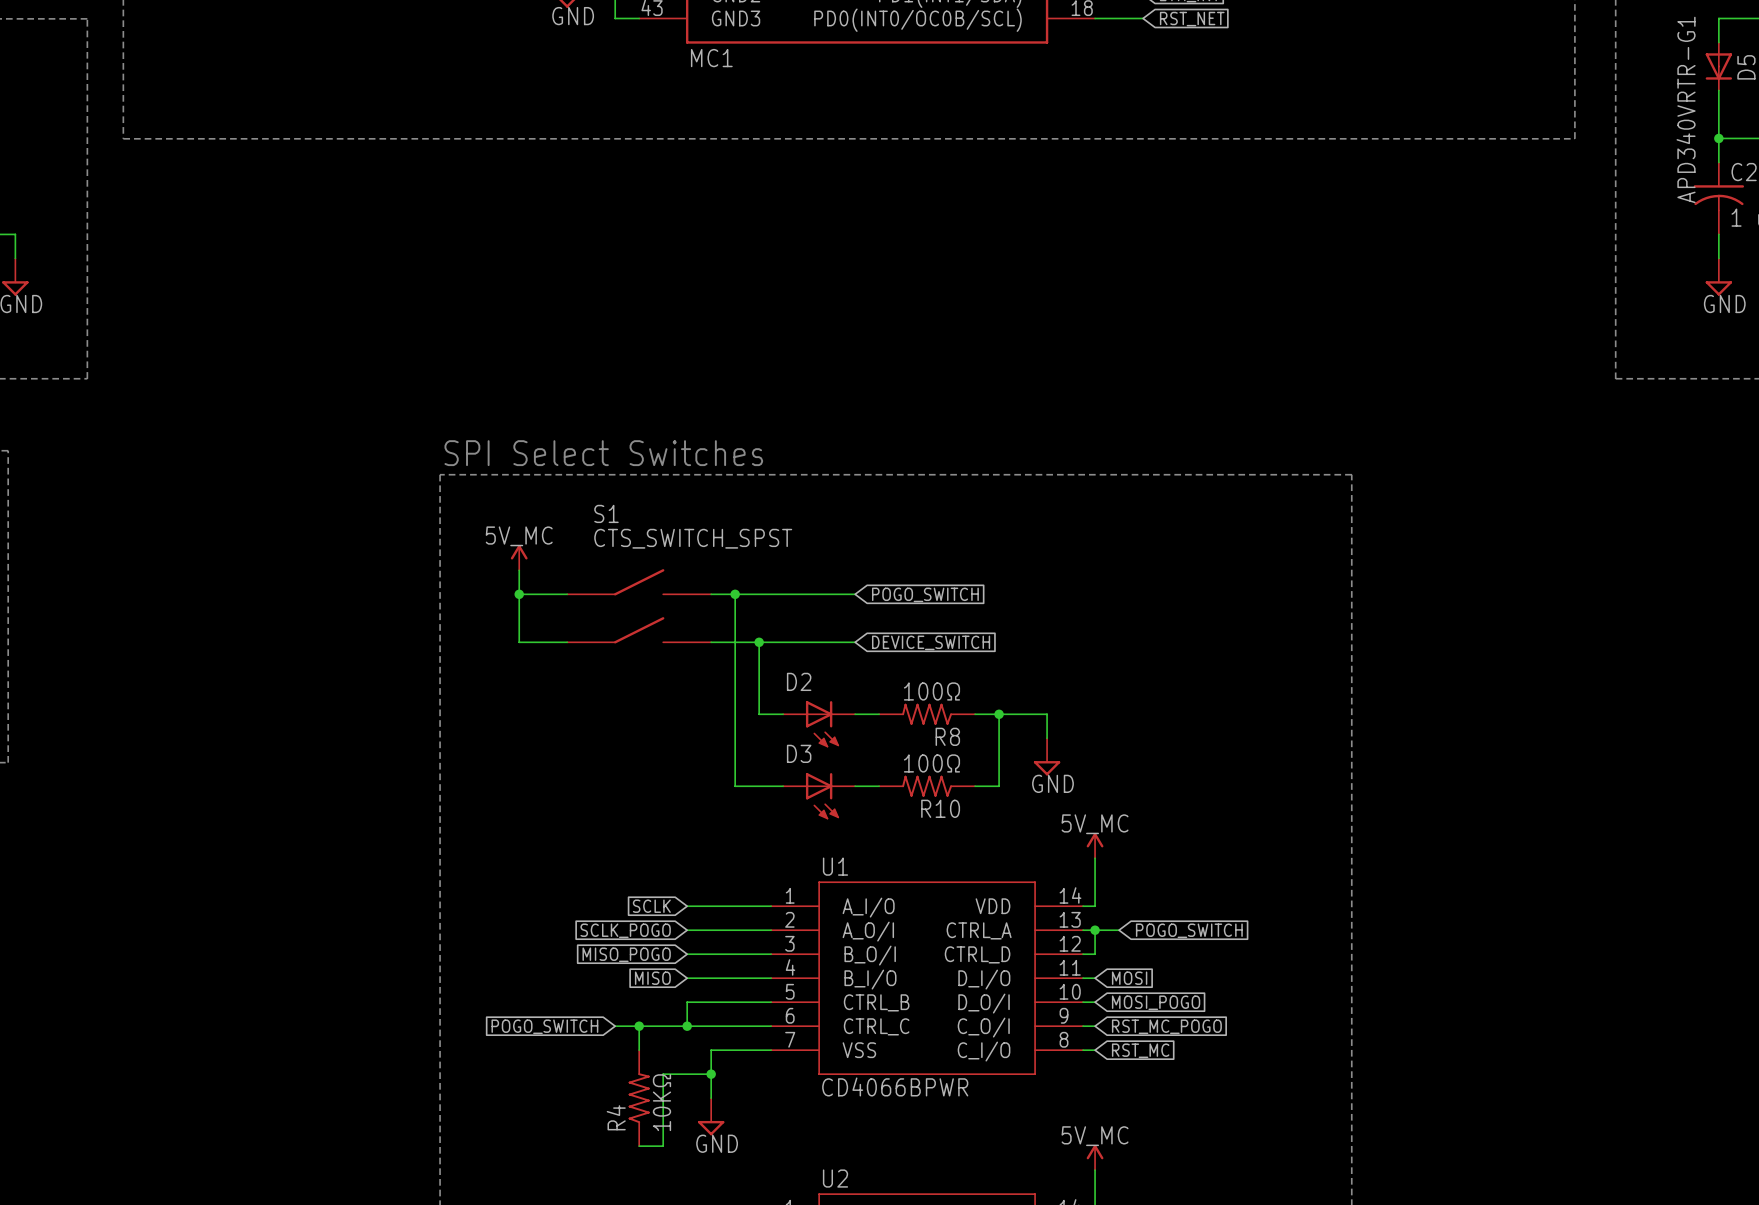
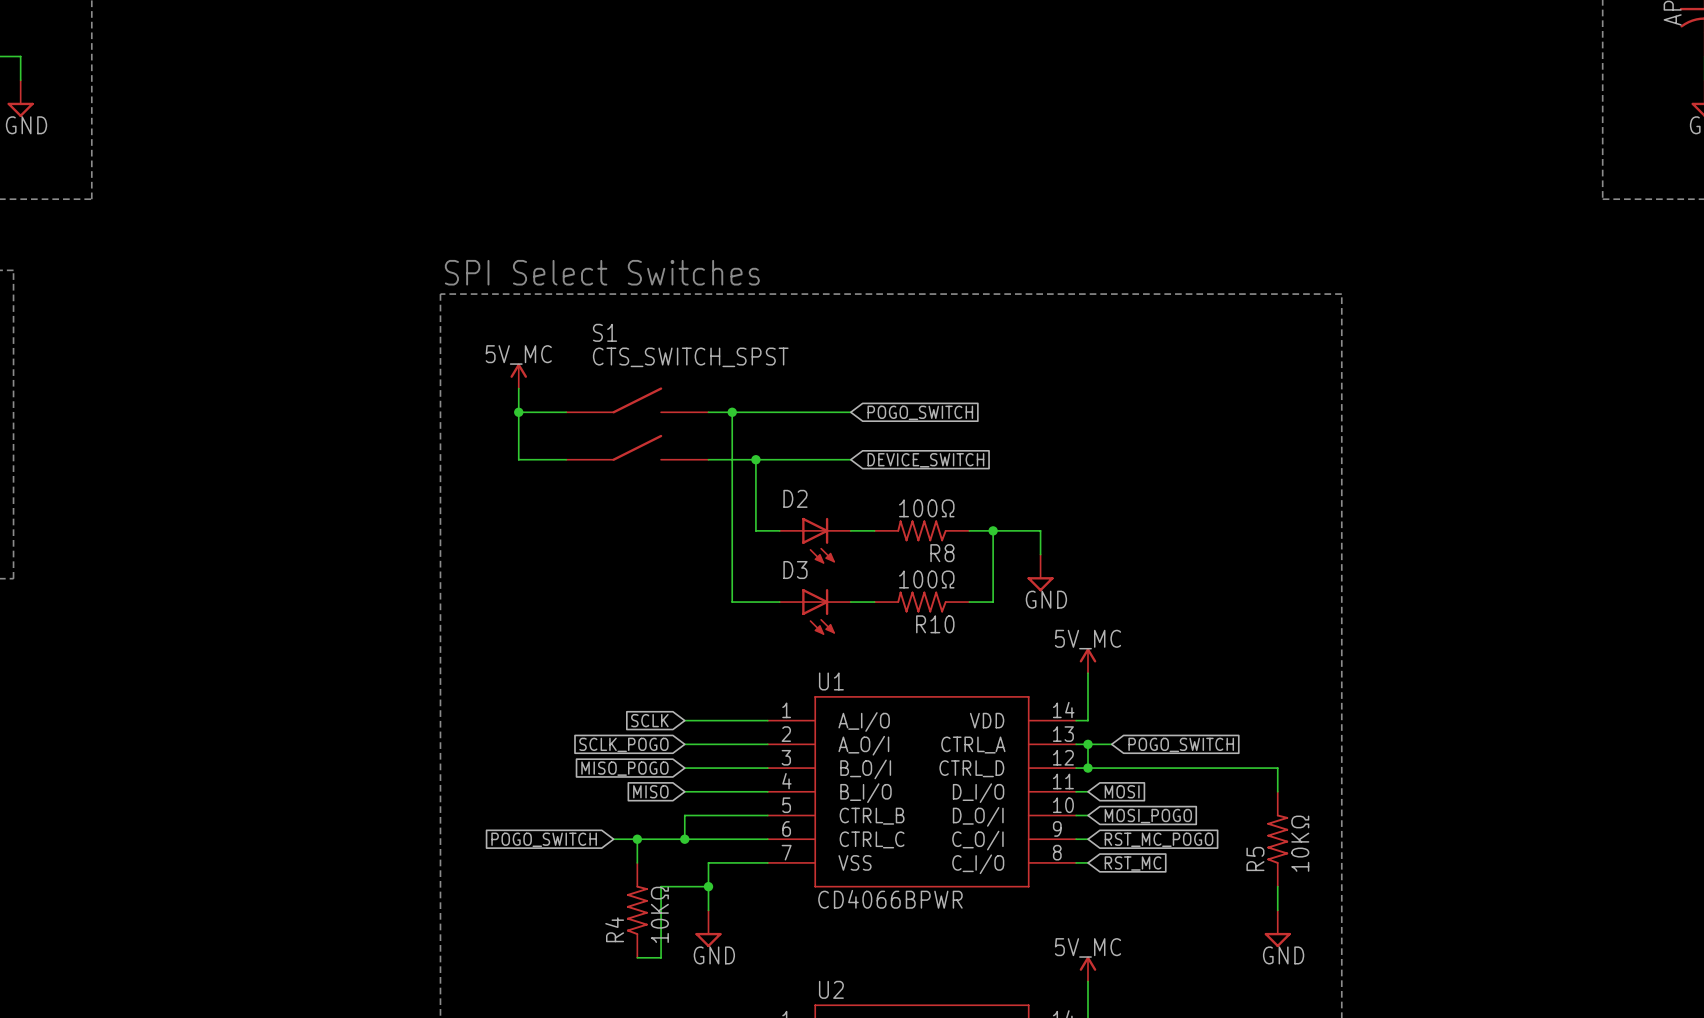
wire: none -> (1087, 768) (1277, 768) (1277, 791)
junction: none -> (1087, 768)
R5: none -> 10KΩ (1277, 839)
wire: none -> (1277, 886) (1277, 910)
power symbol: none -> GND (1277, 928)

